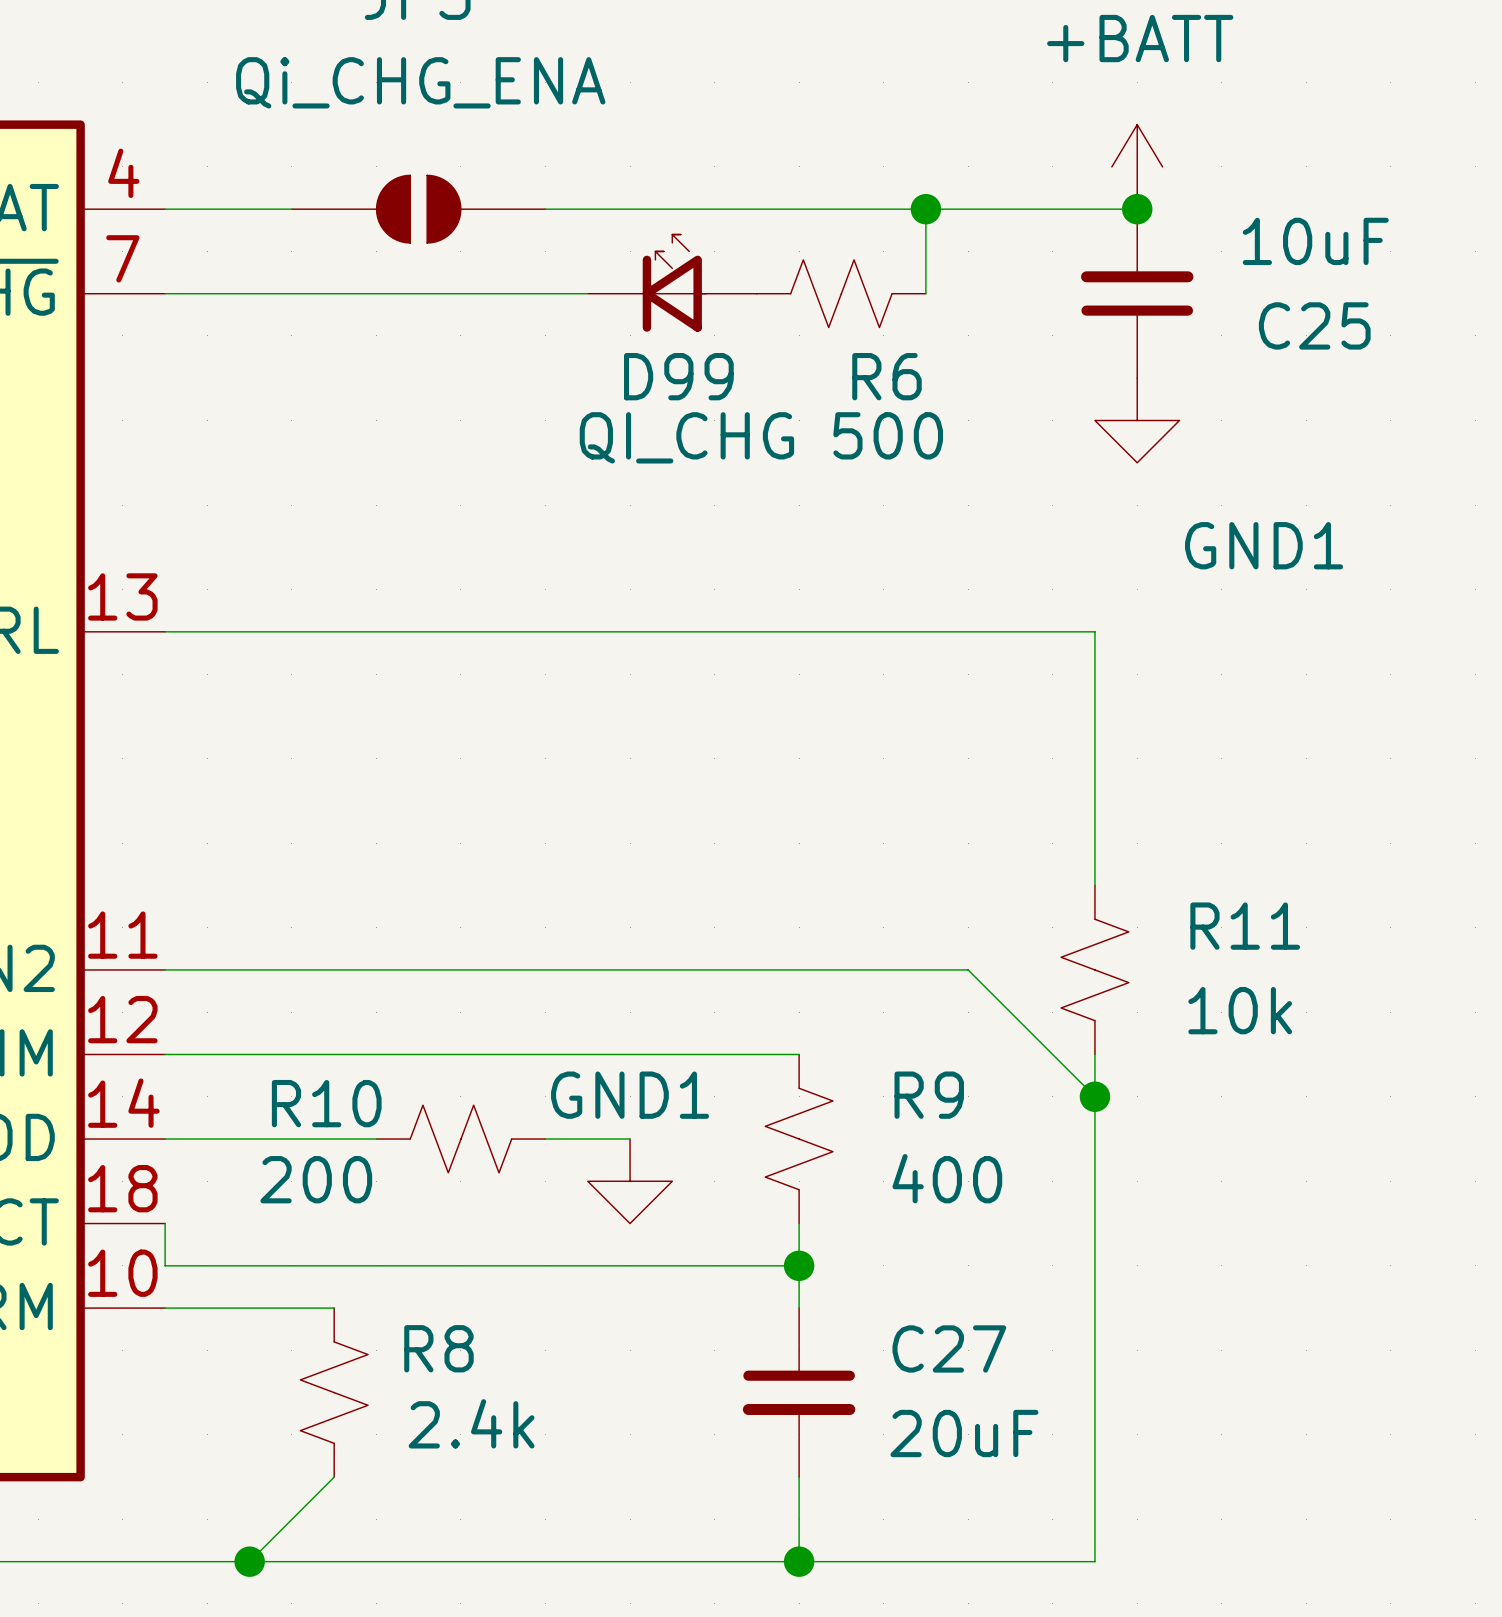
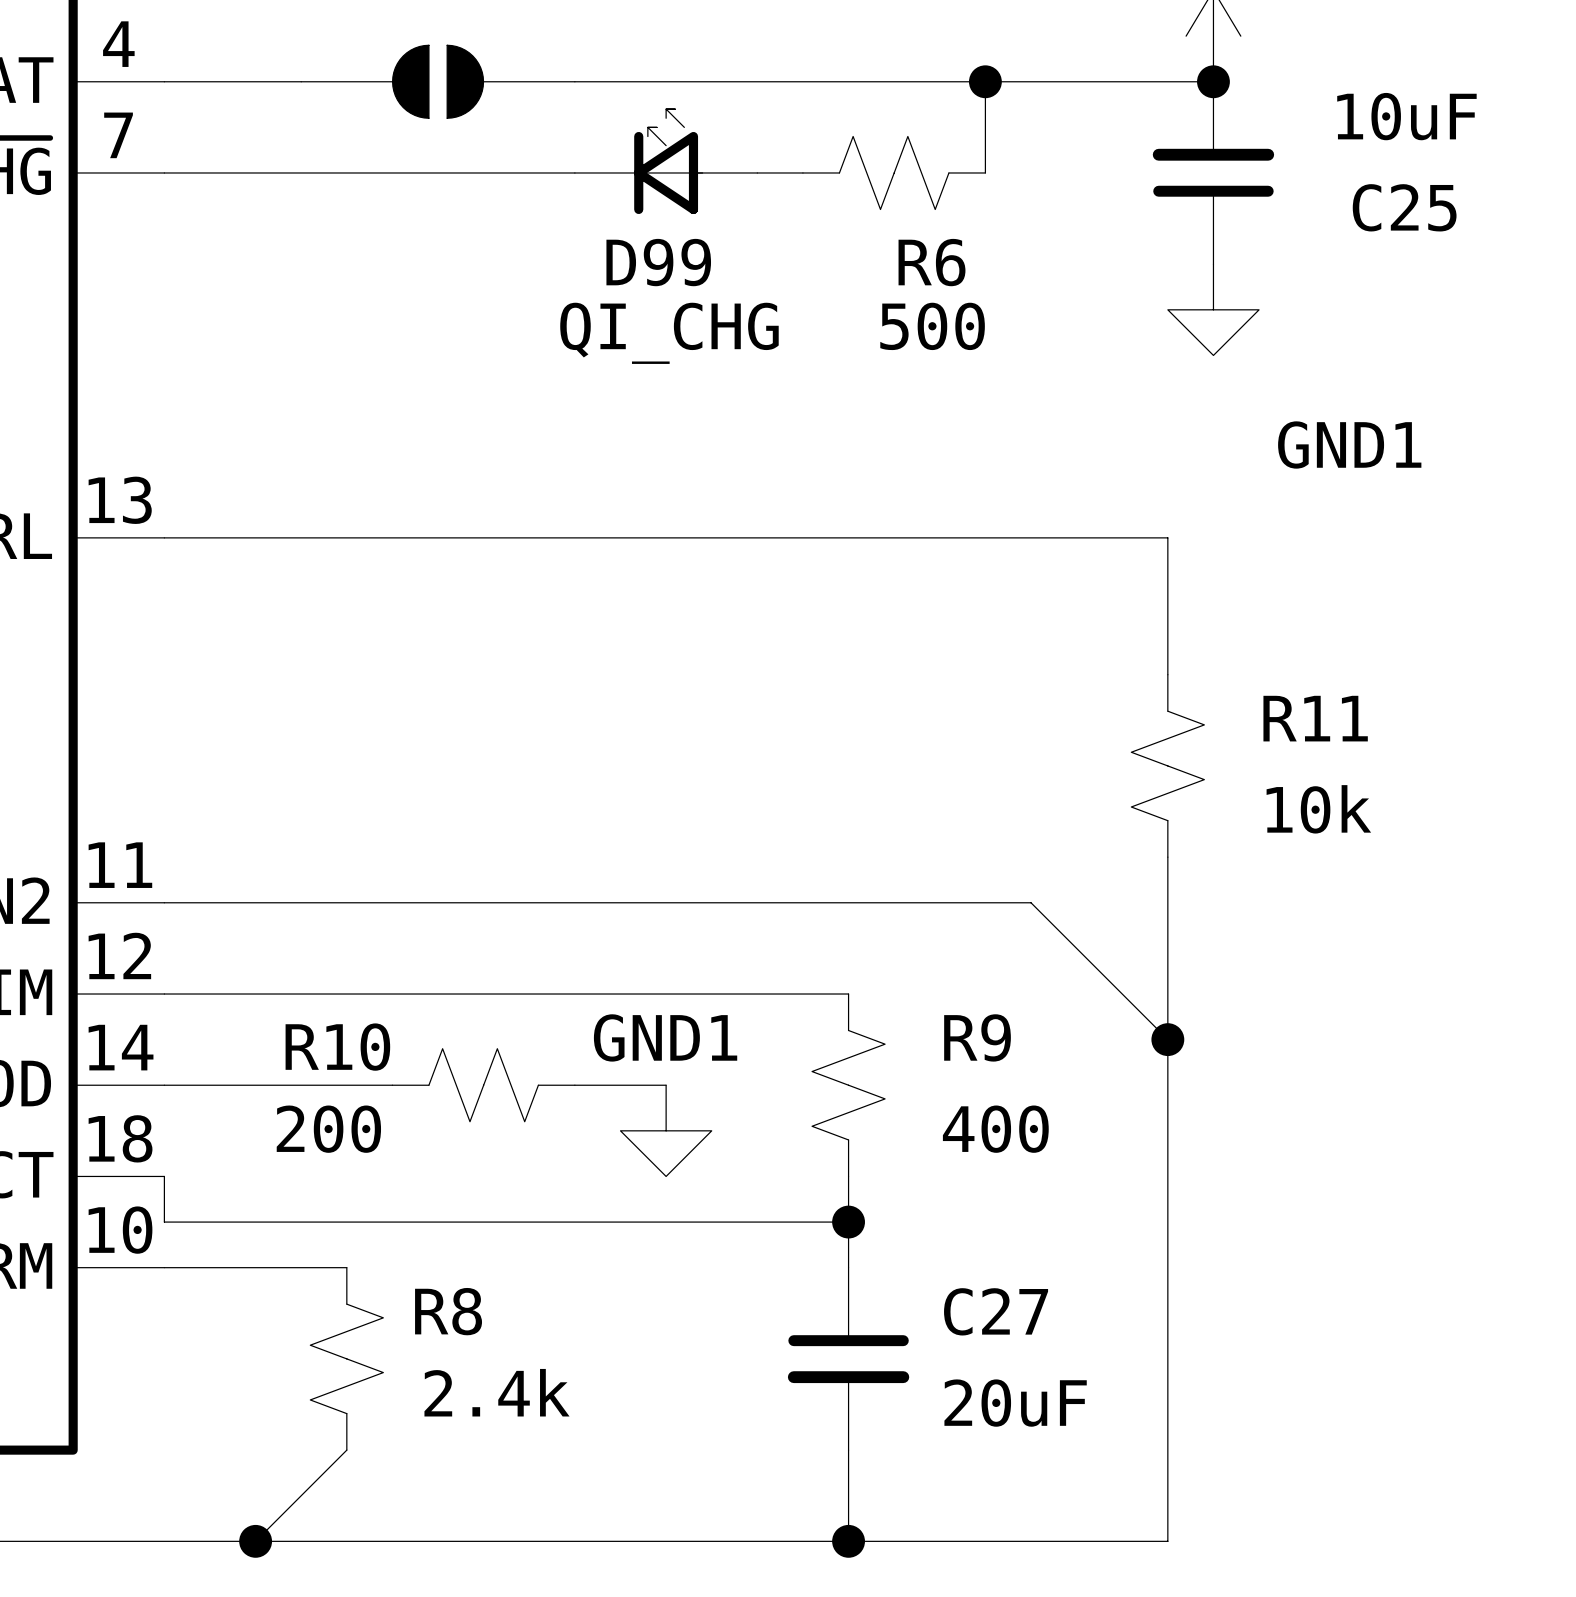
D99 position: (672, 283) -> (666, 161)
wire: (1094, 758) (1094, 885) -> (1167, 857) (1167, 994)
R11 position: (1094, 969) -> (1167, 765)

